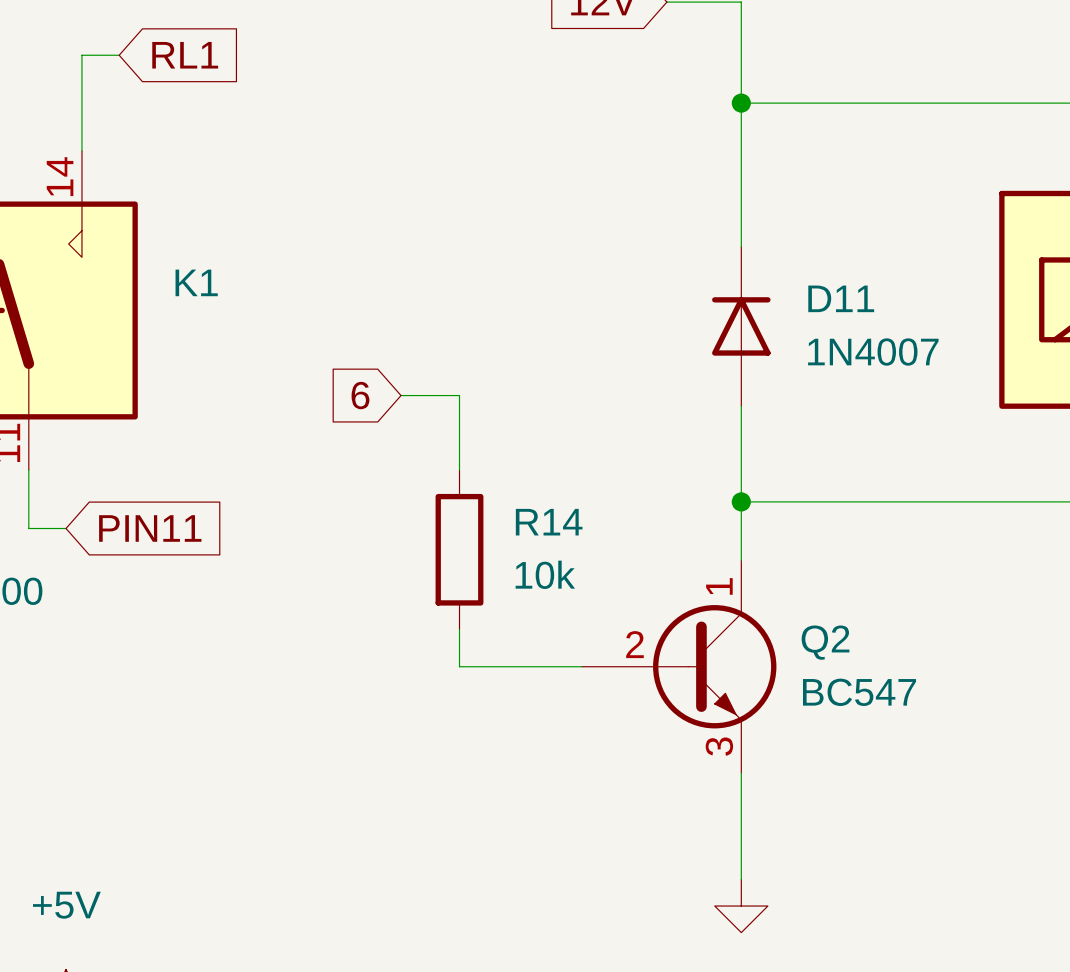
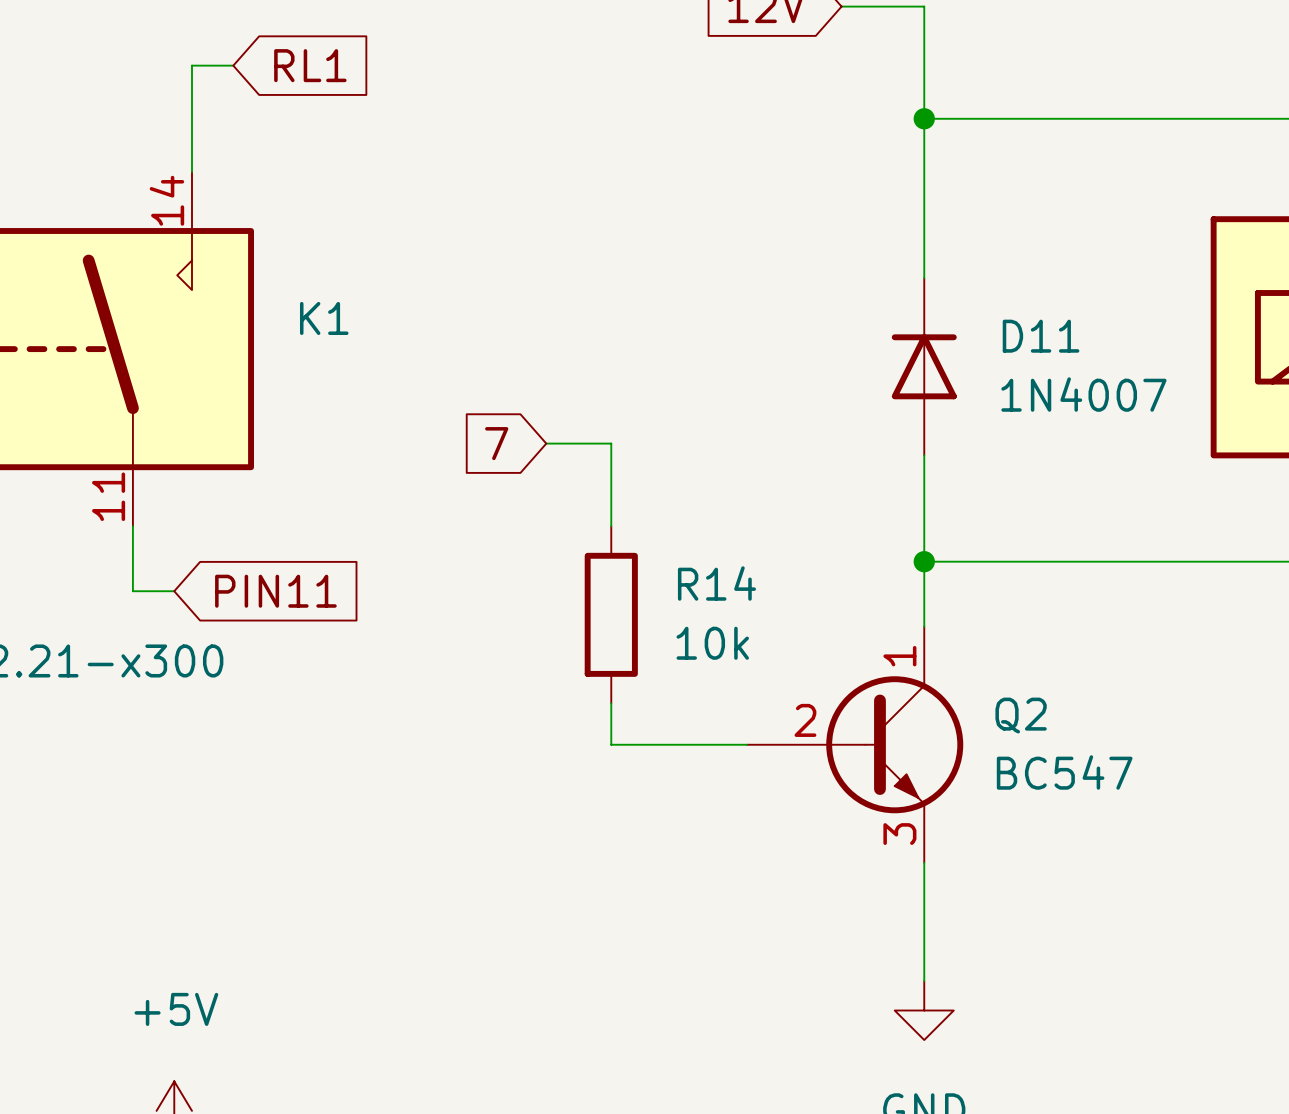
global label: 6 (360, 395) -> 7 (496, 443)

